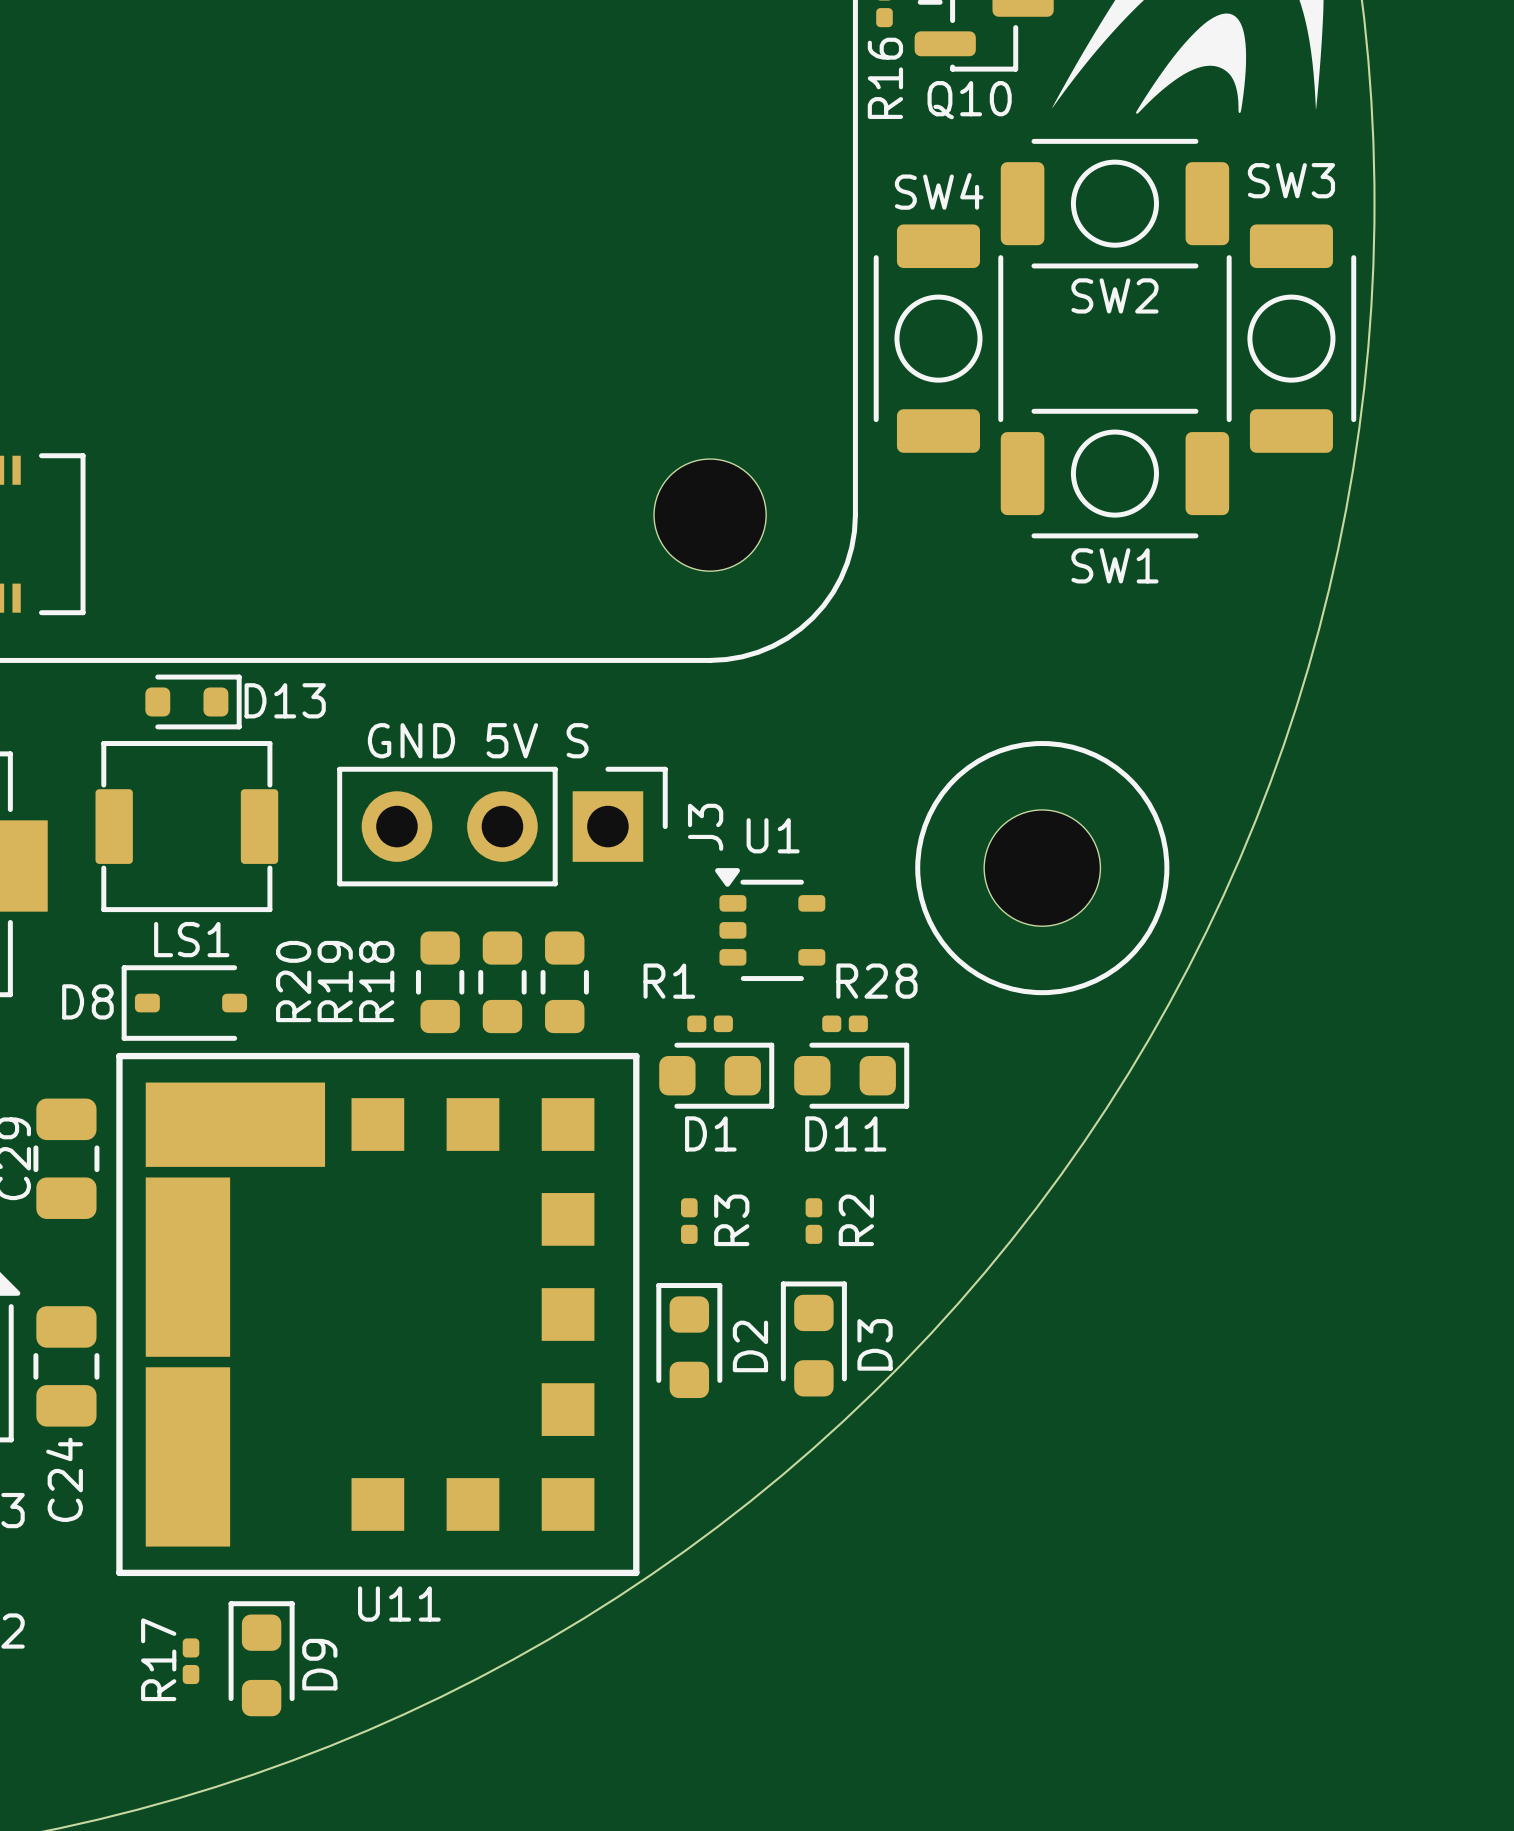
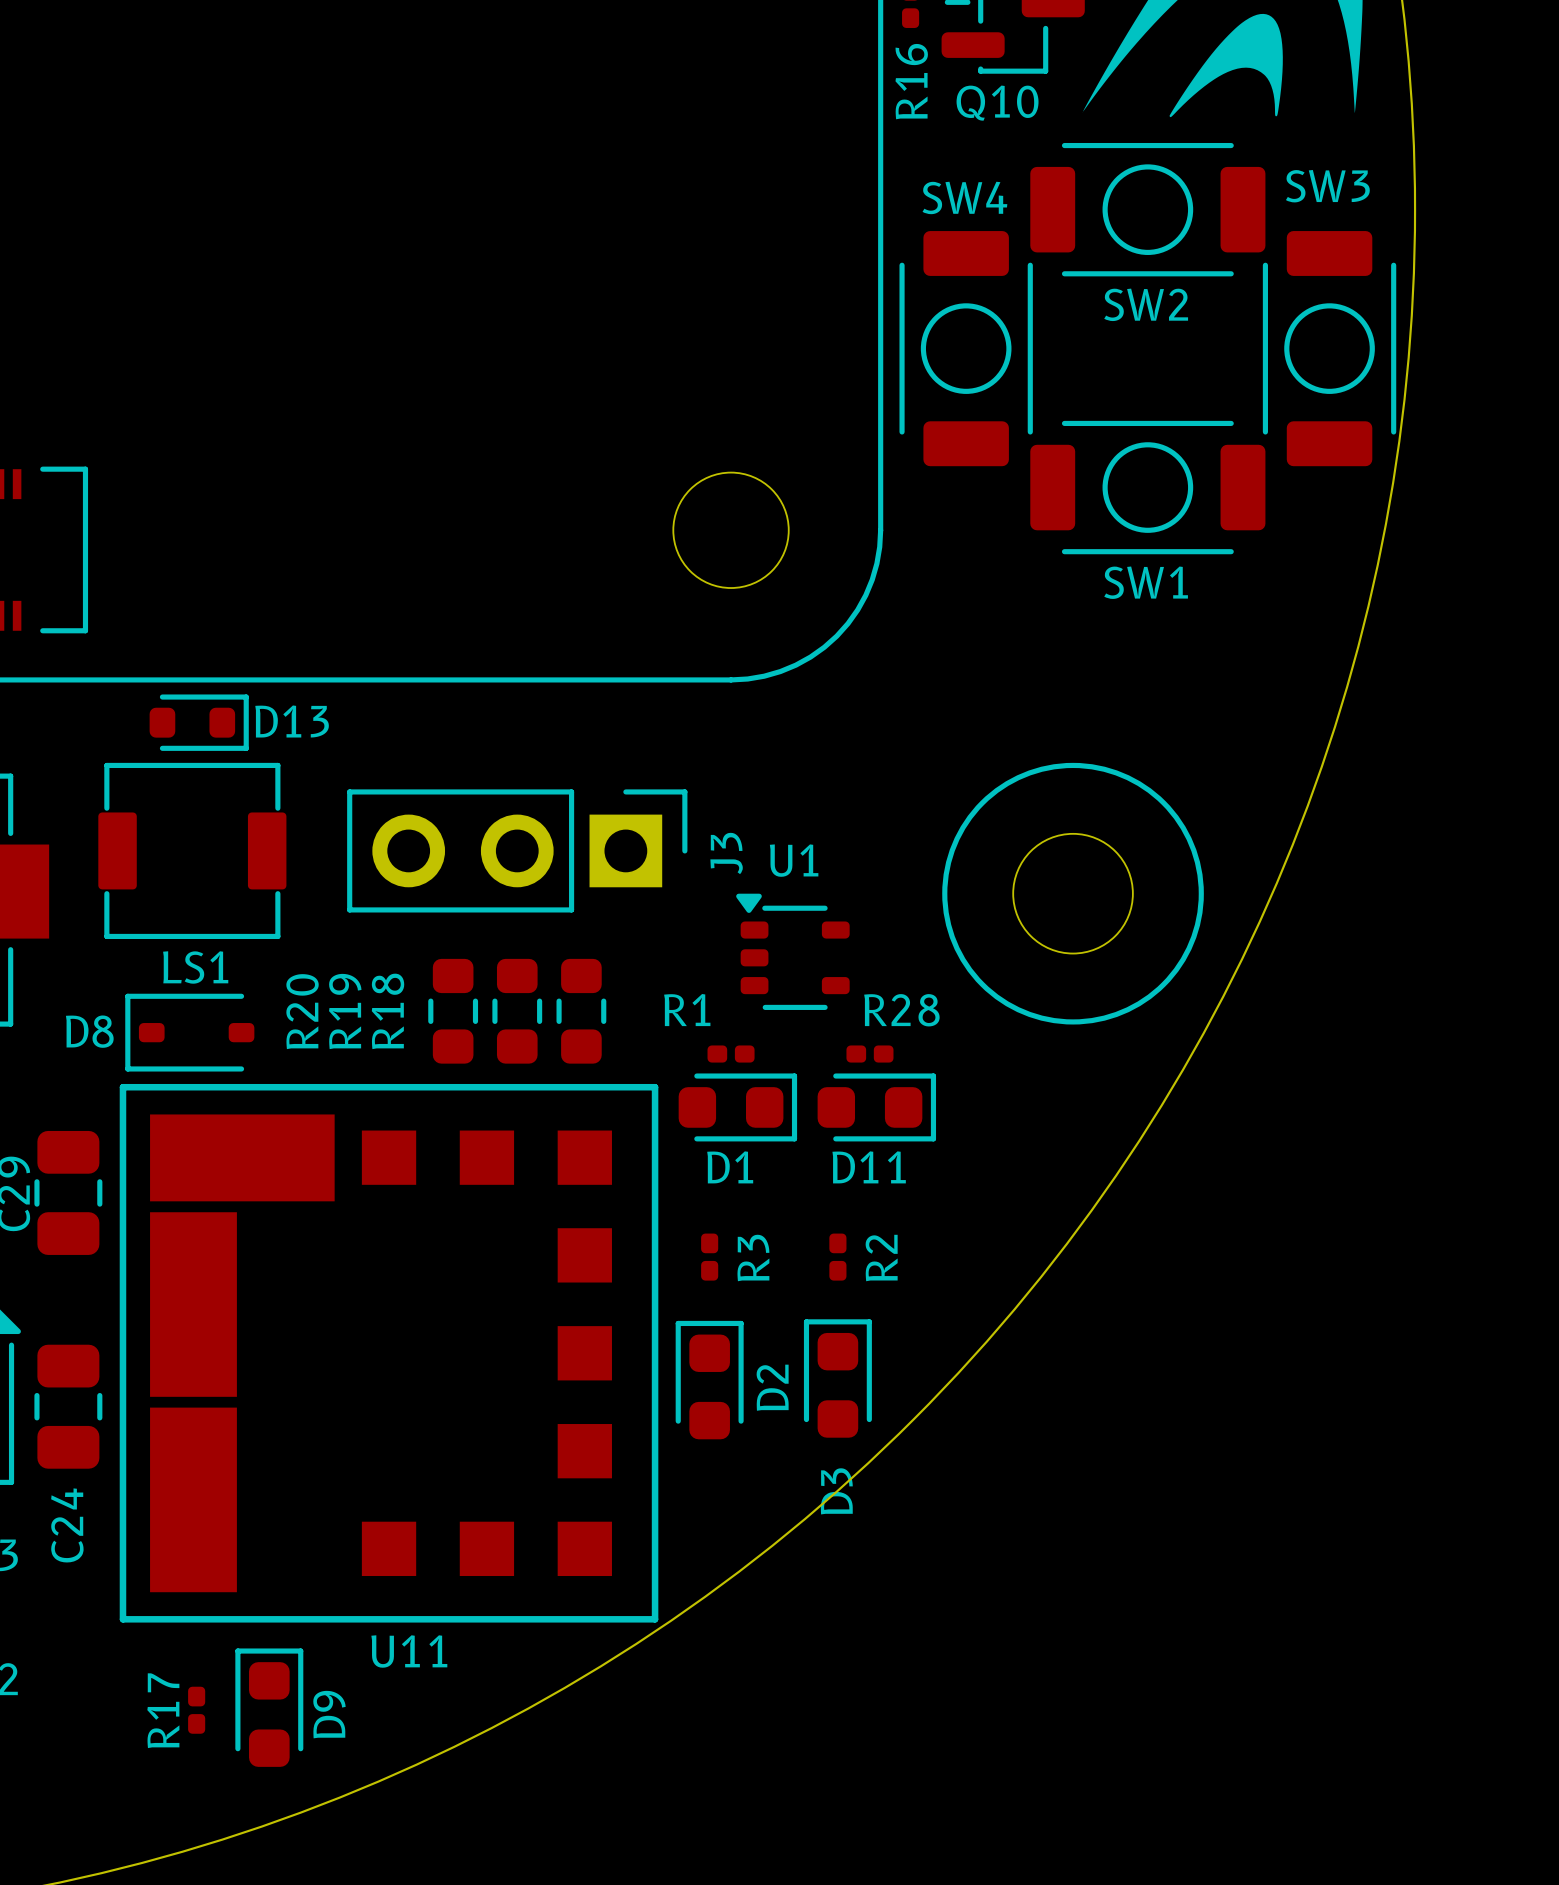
text: GND 5V S (478, 740) -> none
D3 name position: D3 (875, 1344) -> D3 (836, 1491)

